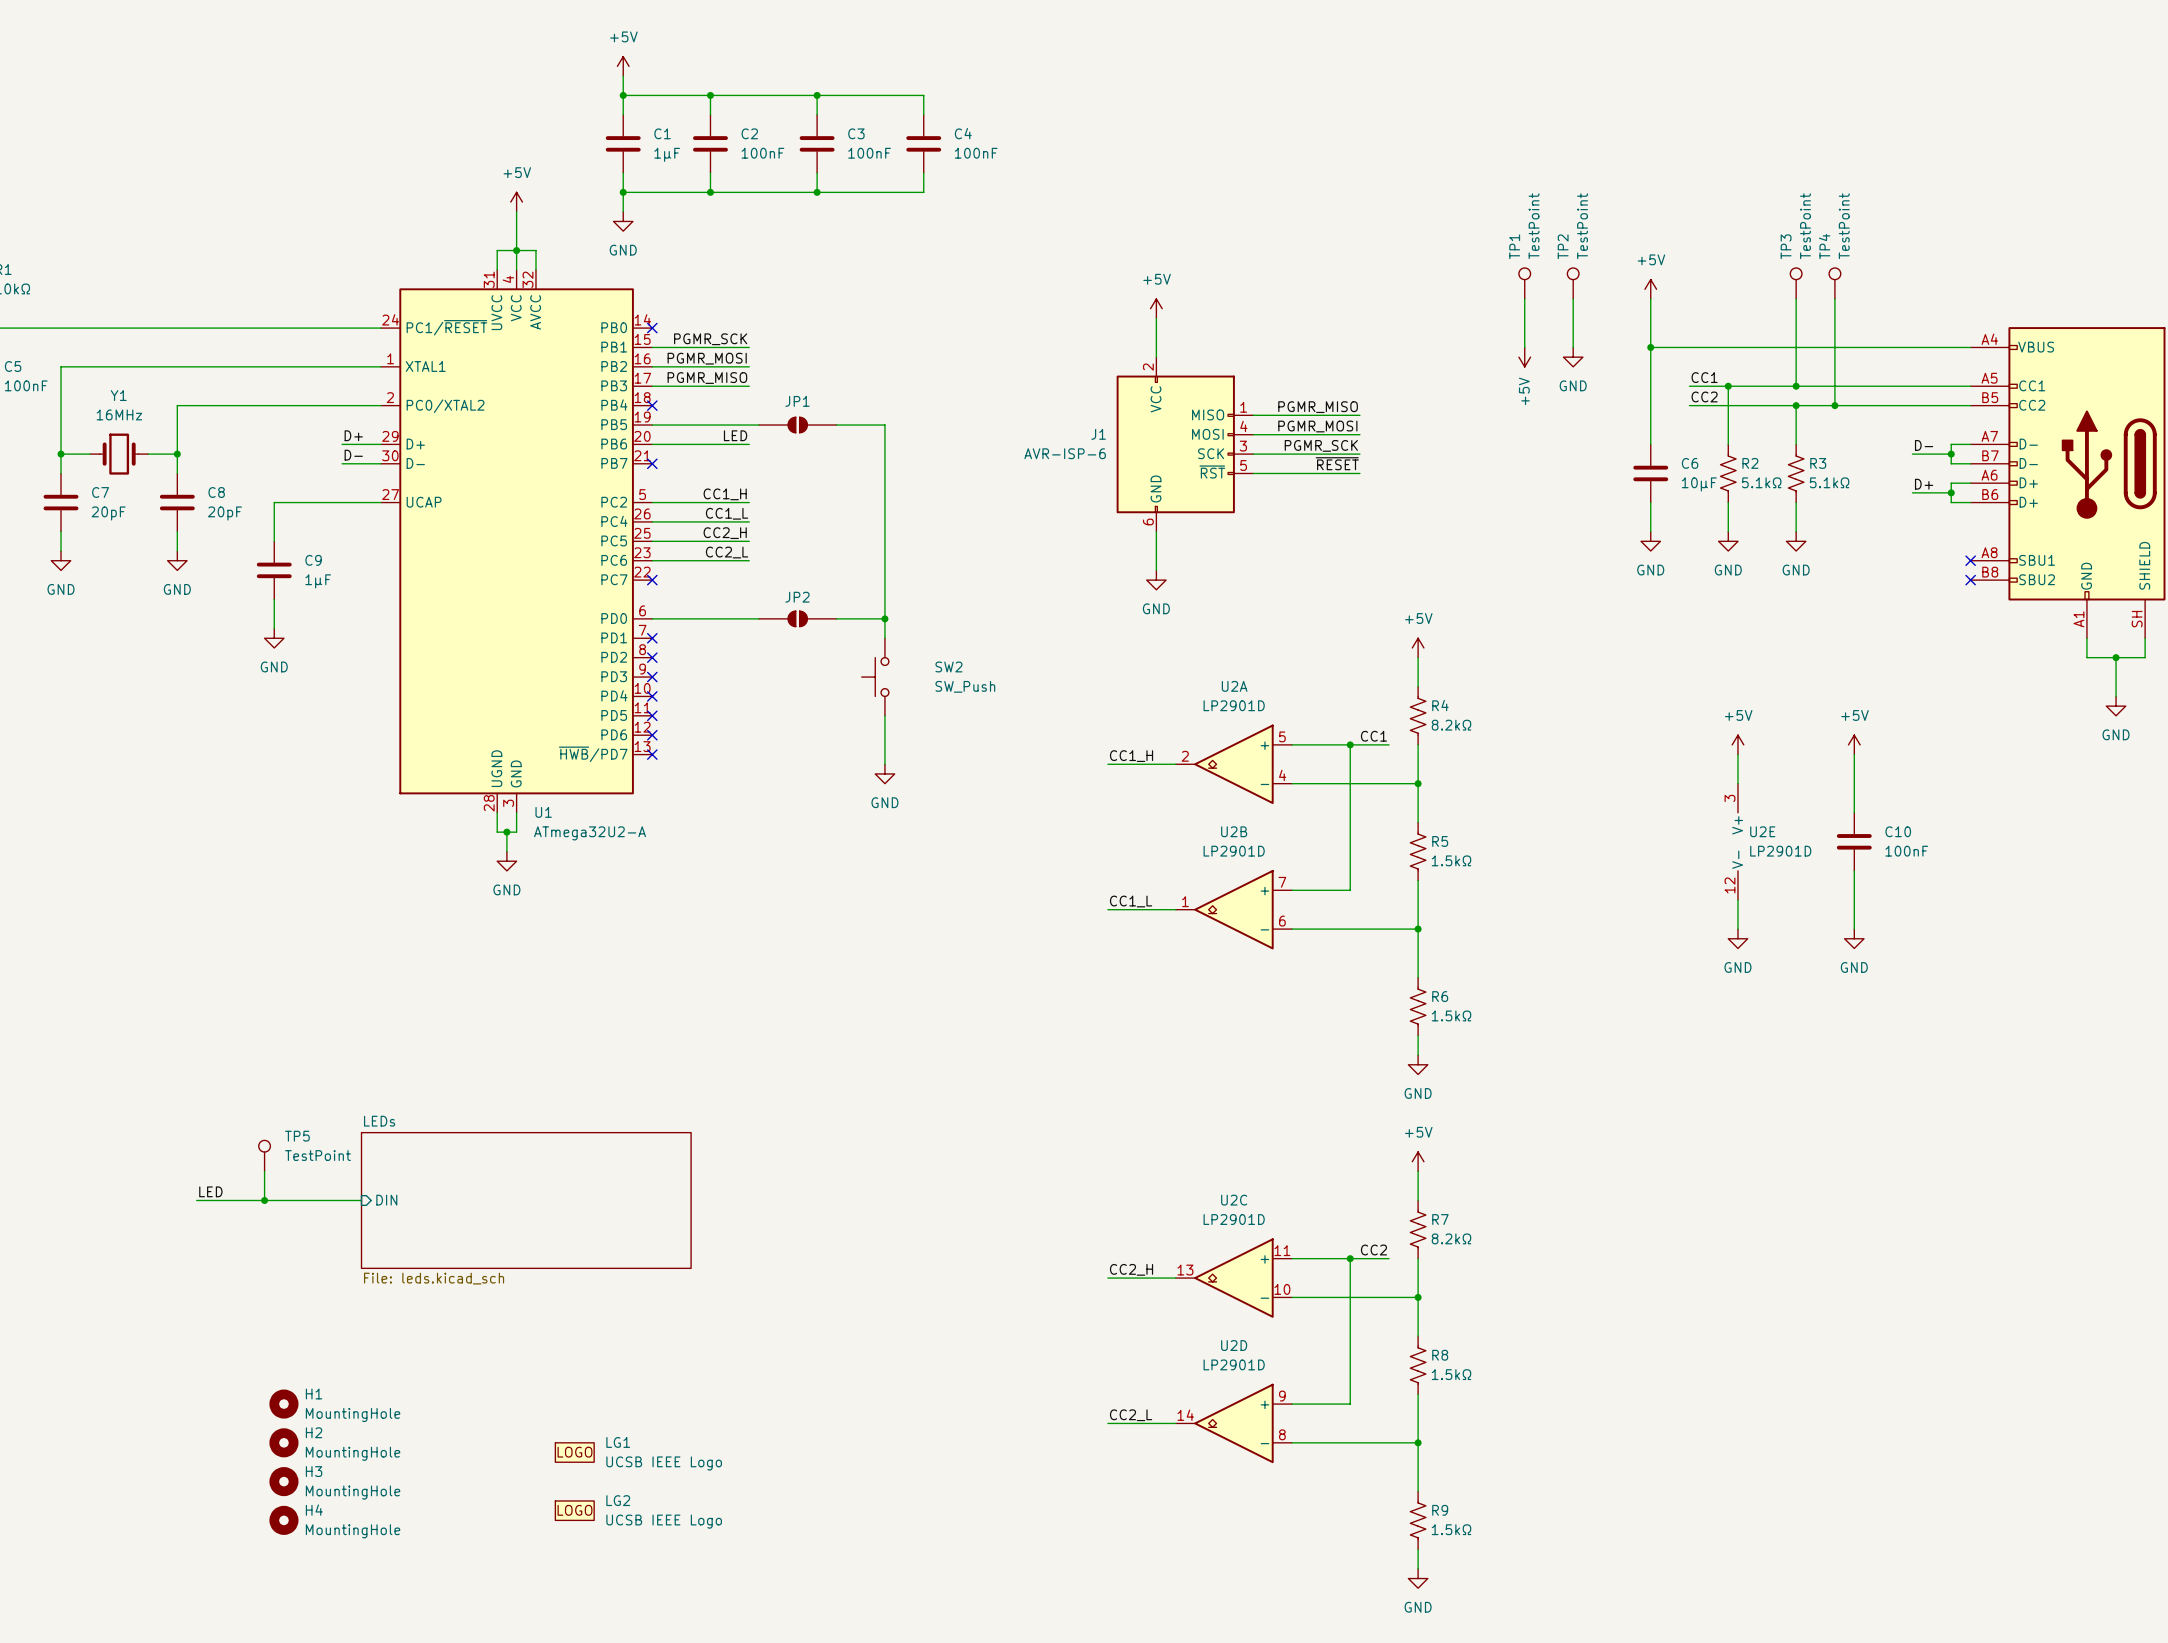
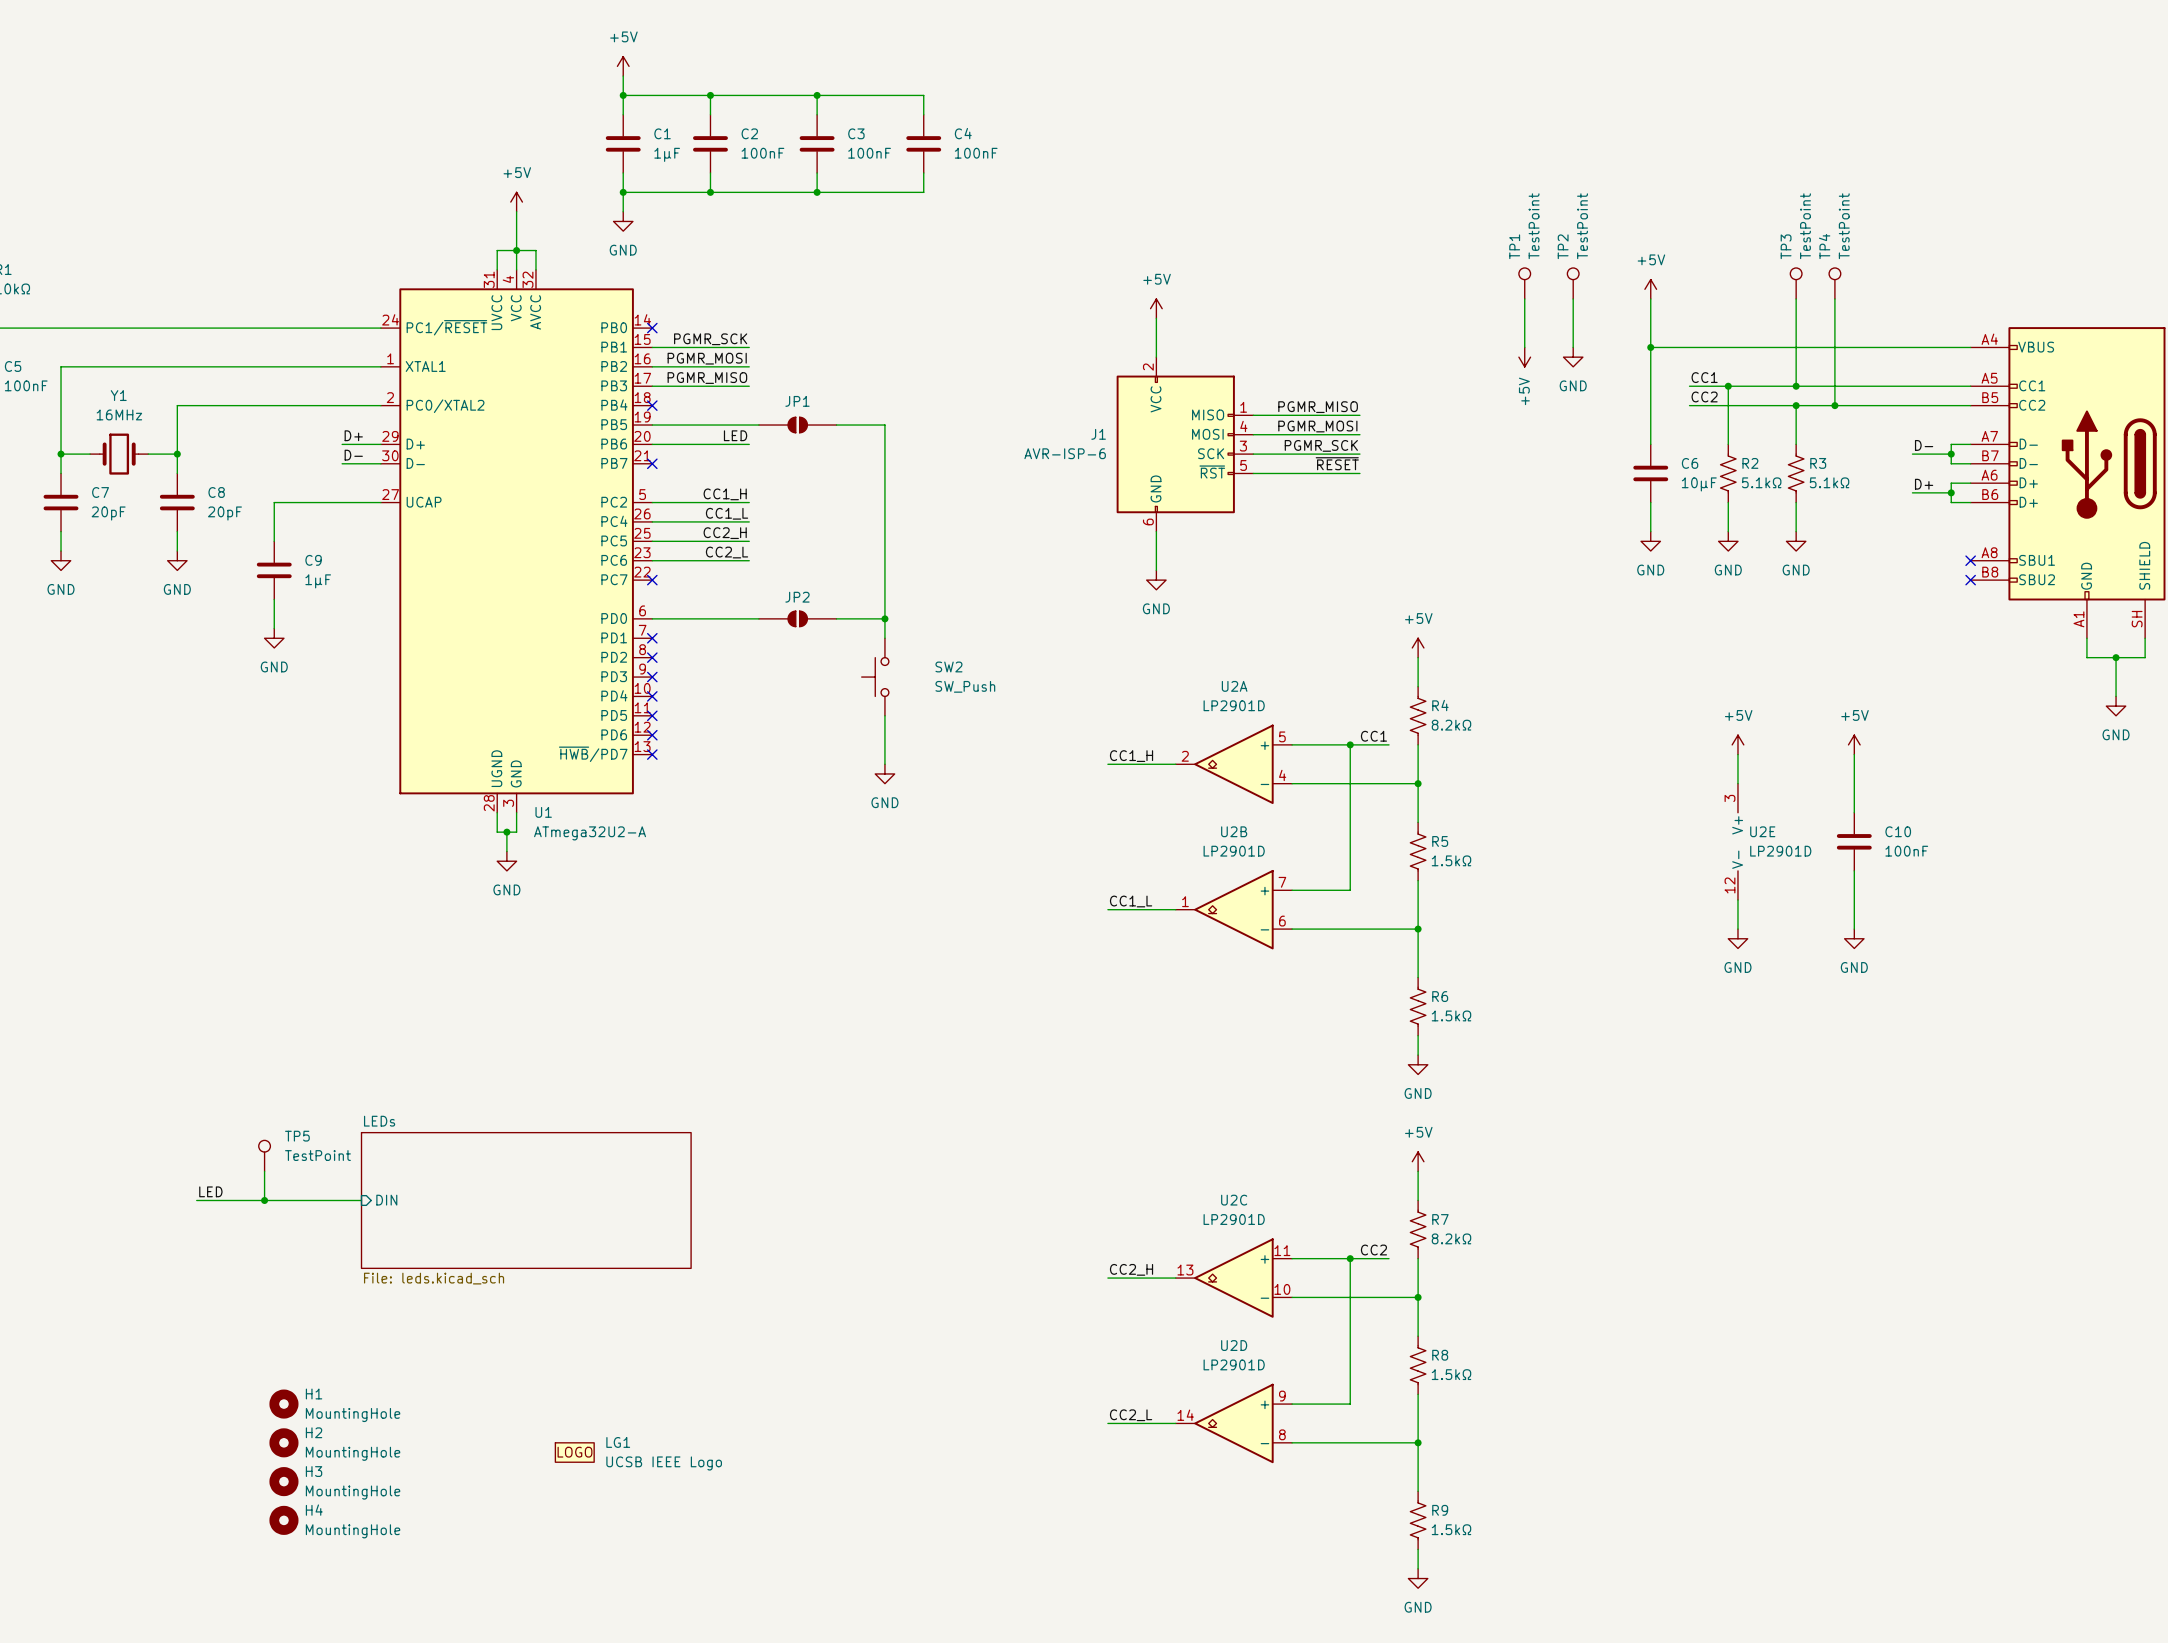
LG2: UCSB IEEE Logo (574, 1510) -> none

